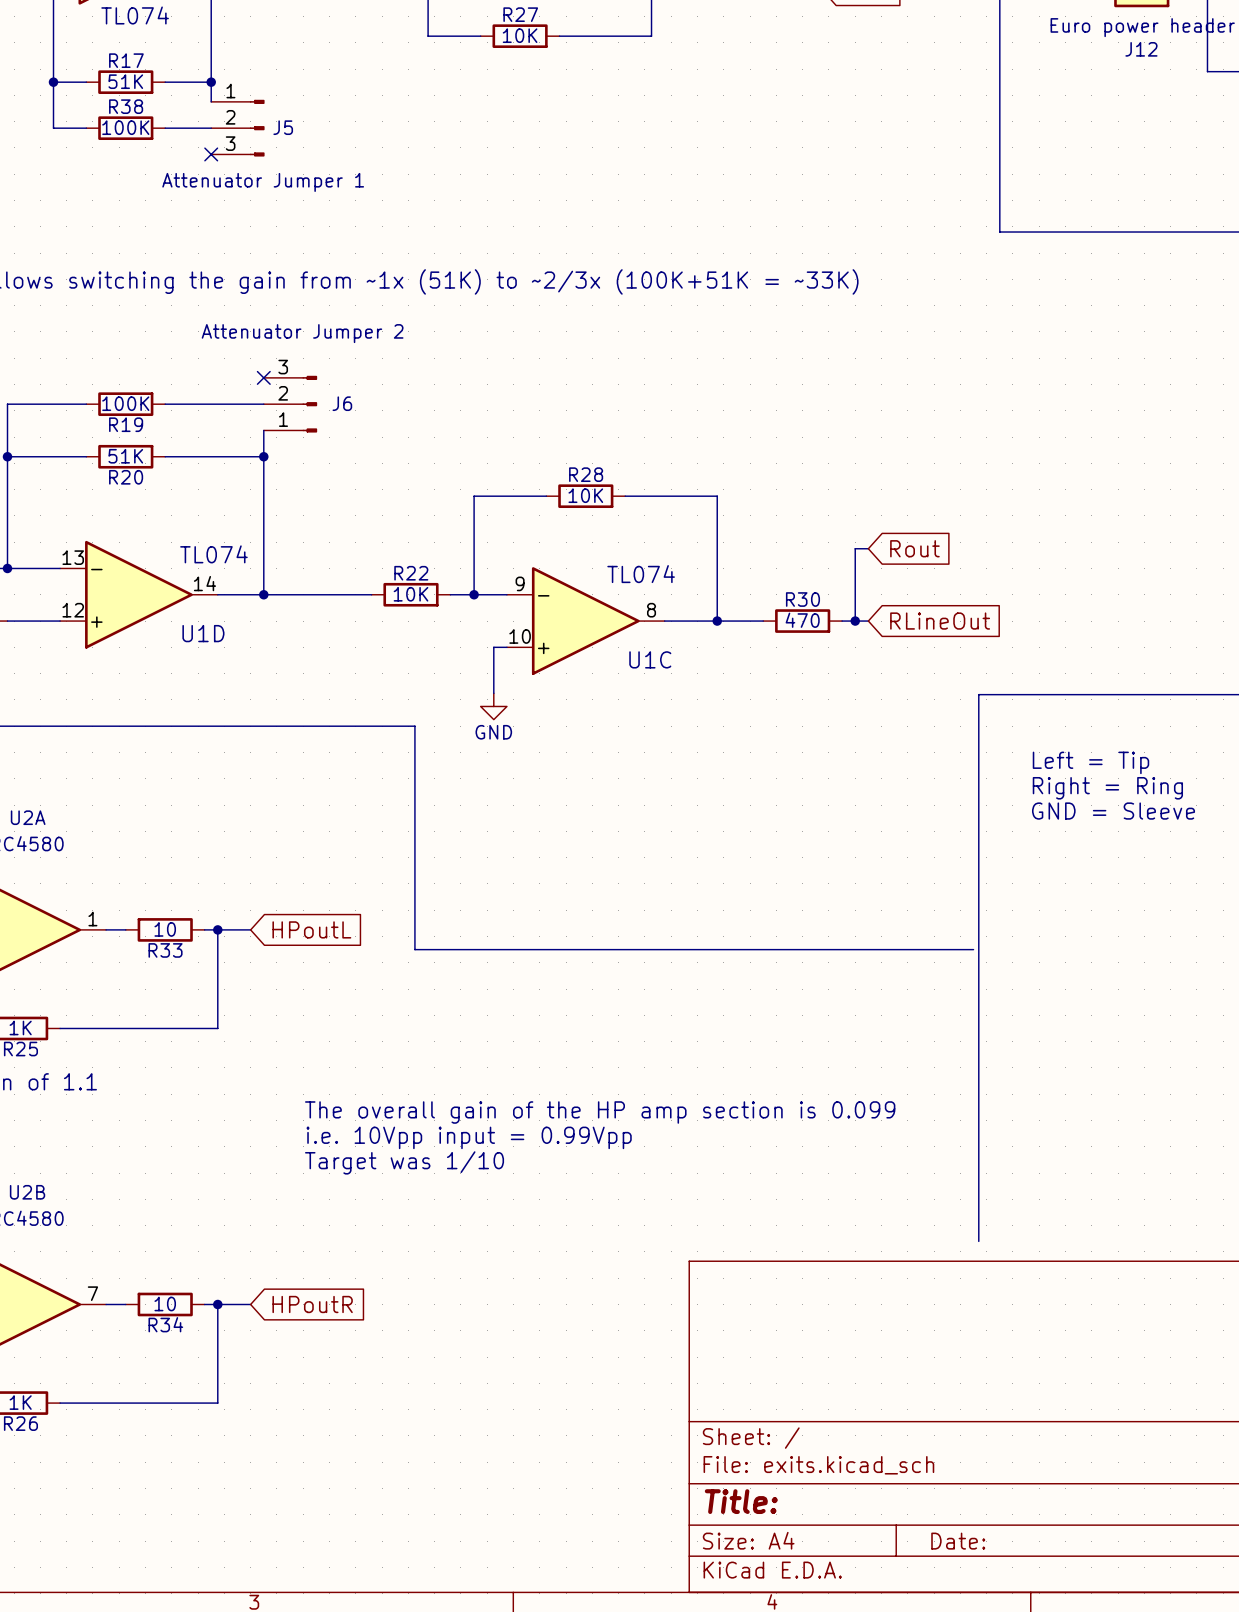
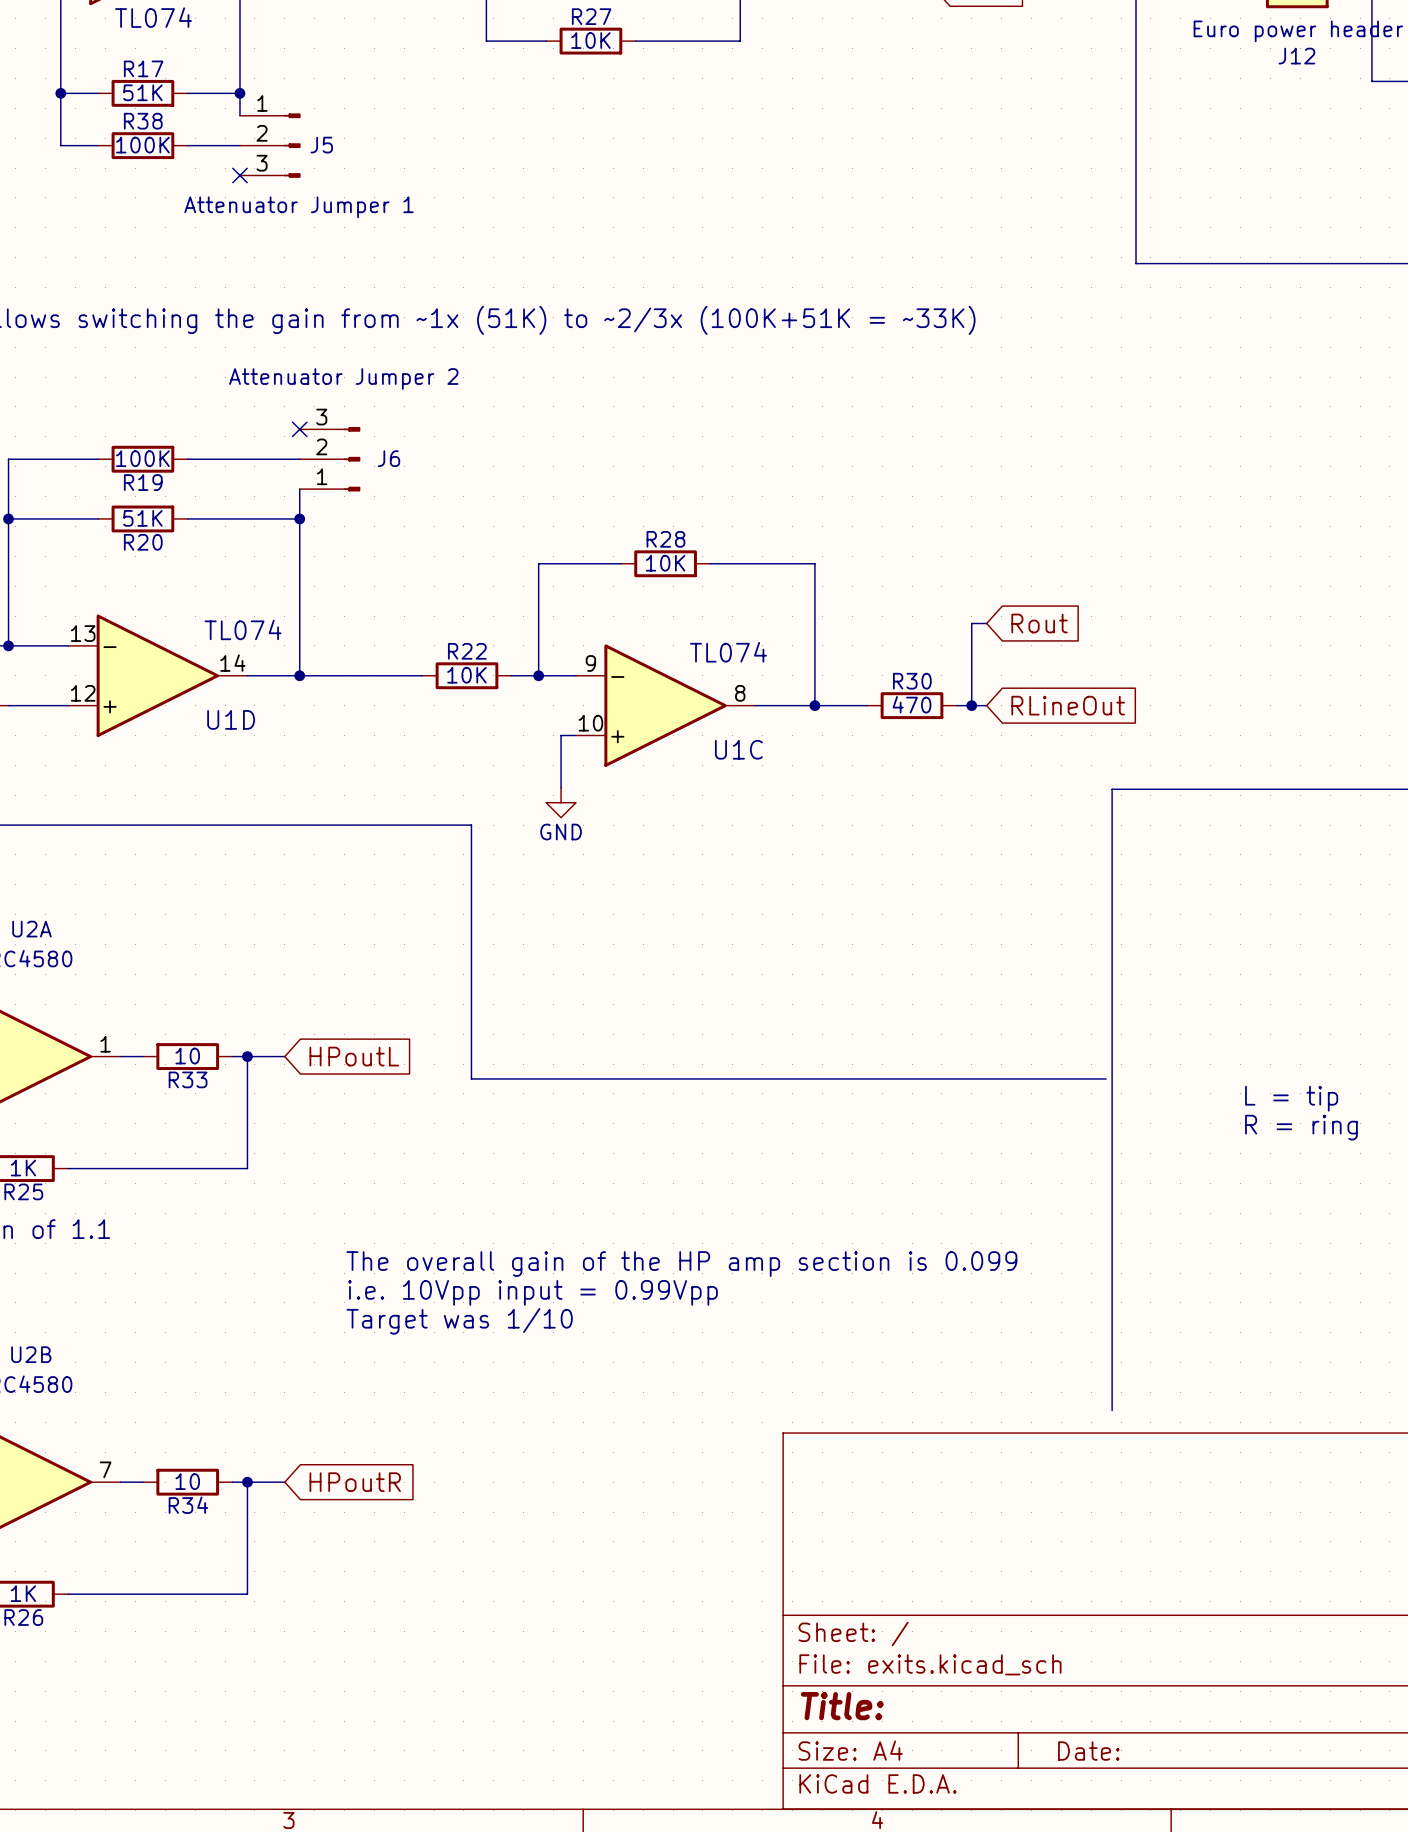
text: Left = Tip (1090, 762) -> none
text: Right = Ring (1107, 788) -> none
text: GND = Sleeve (1113, 811) -> none
text: none -> L = tip (1291, 1098)
text: none -> R = ring (1301, 1127)

